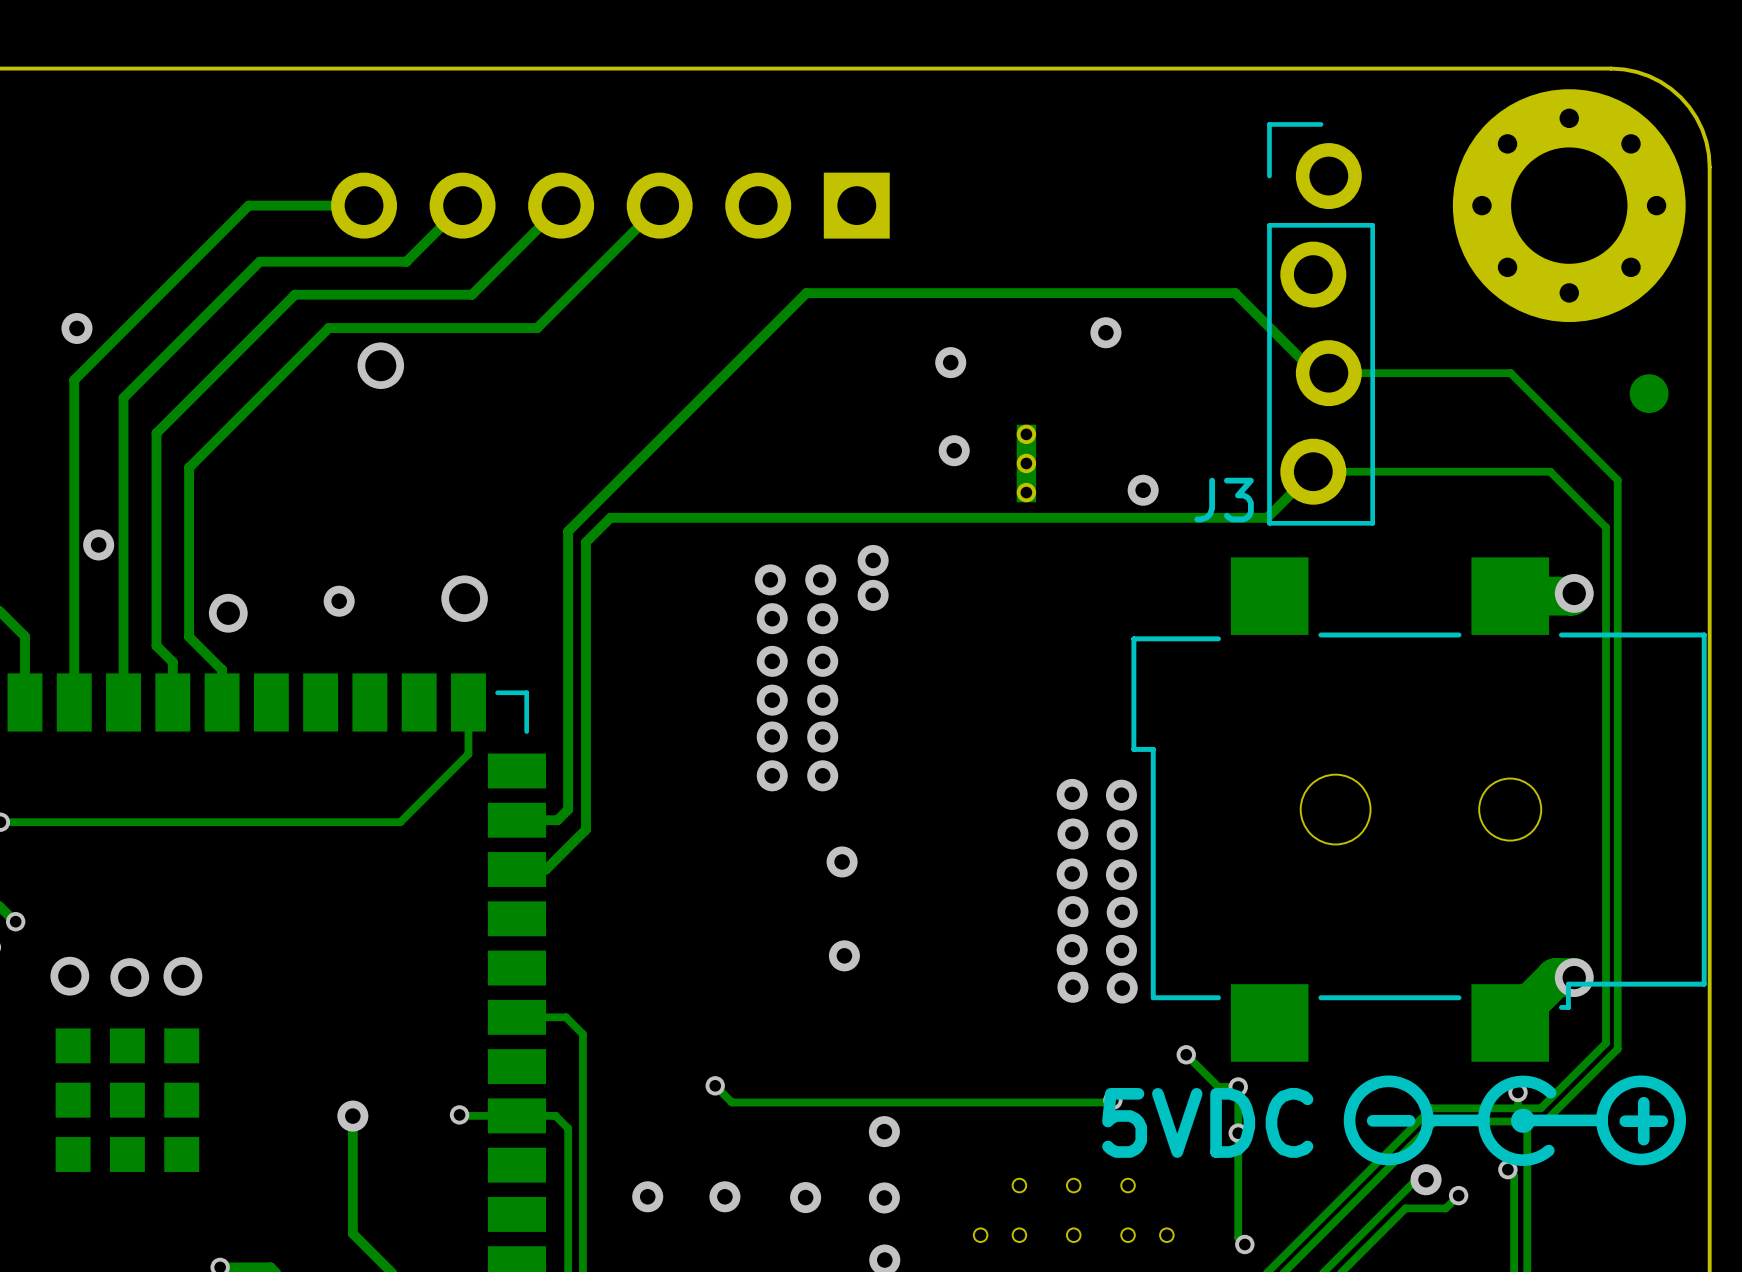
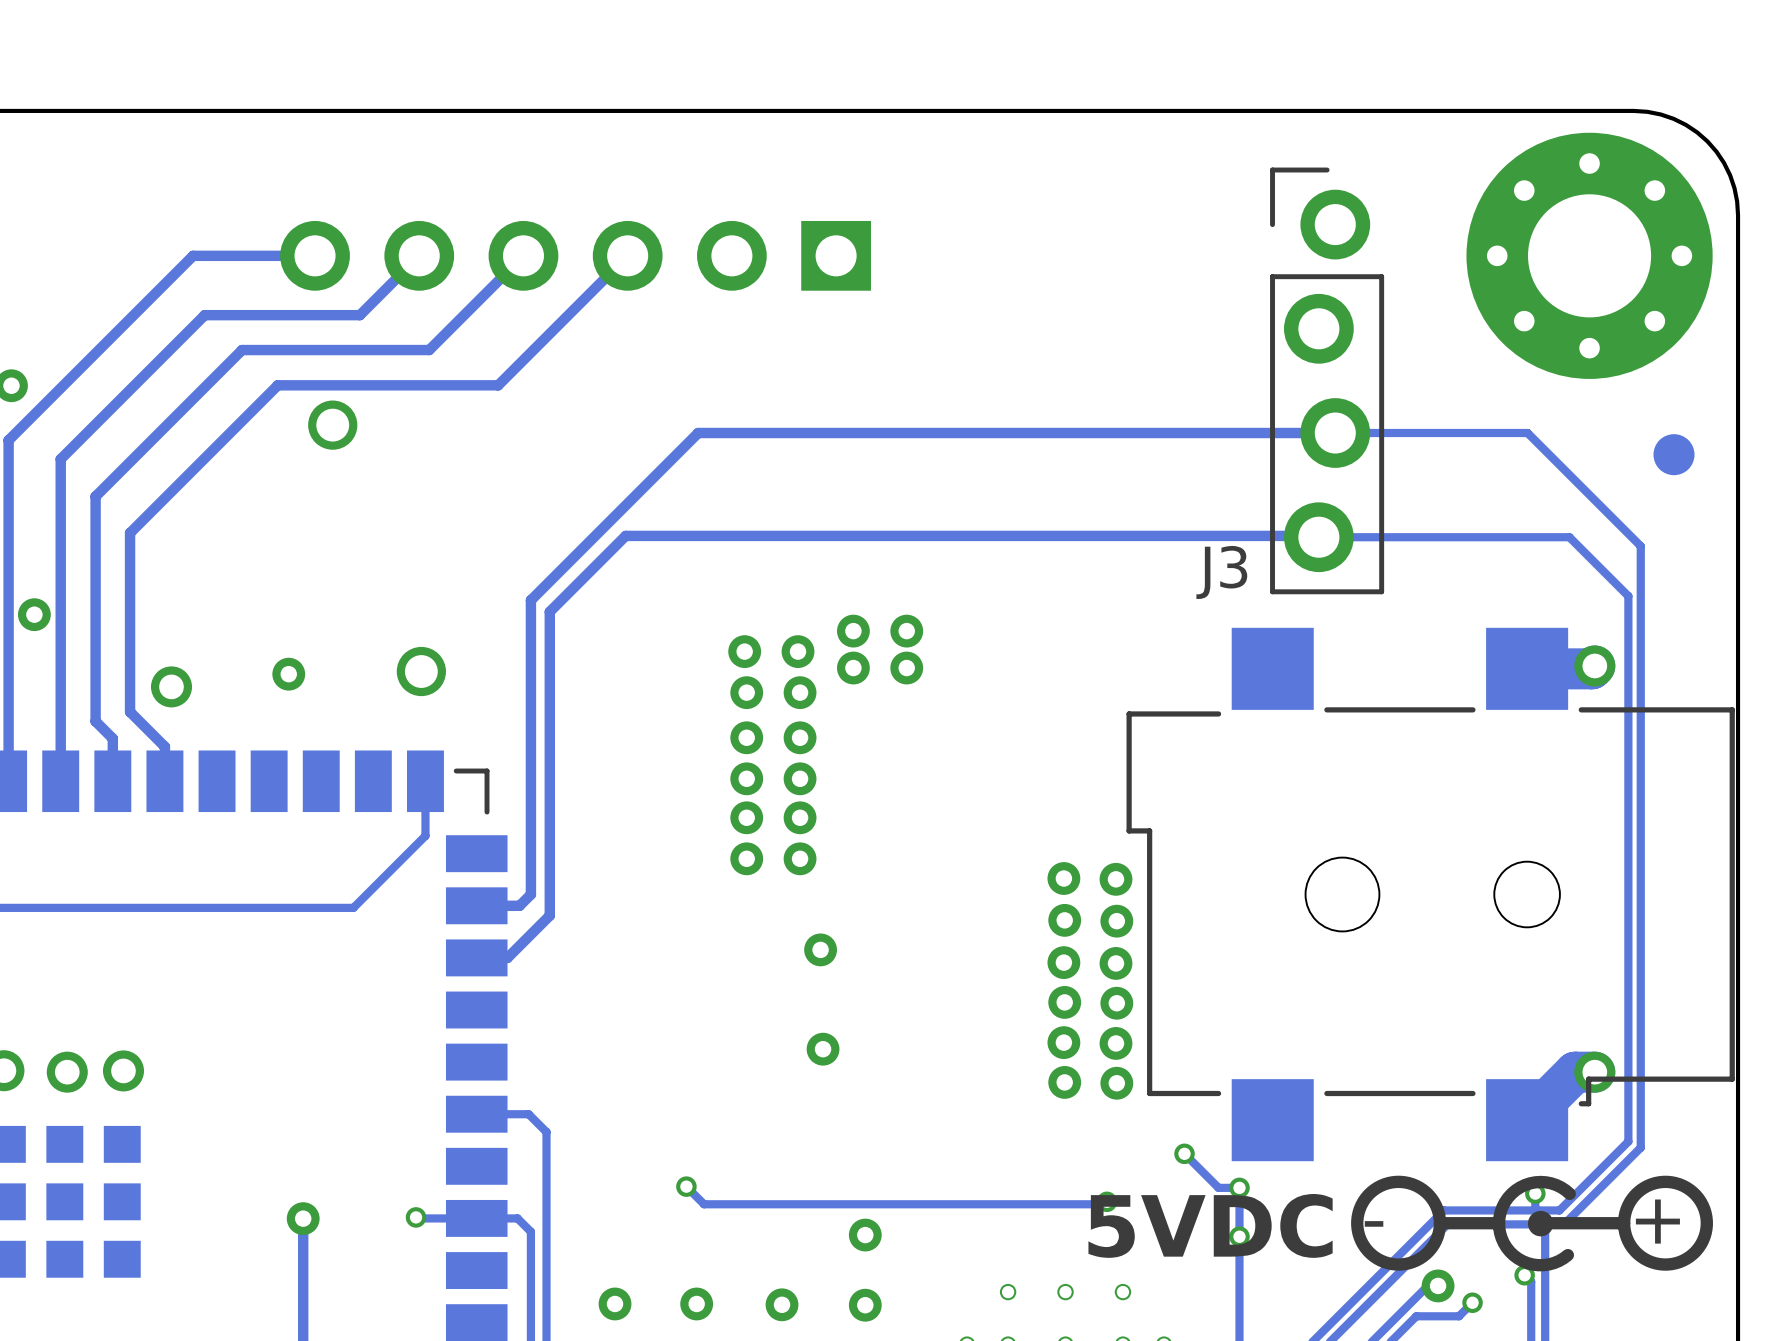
via: (1105, 332) -> none
via: (950, 362) -> none
track: (1315, 373) (1235, 293) (806, 293) (726, 373) -> (1320, 433) (698, 433)
via: (954, 450) -> none
part: (1026, 463) -> none
track: (1326, 471) (1313, 471) (1267, 517) (610, 517) -> (1333, 537) (625, 535) (575, 585)
via: (1143, 490) -> none
via: none -> (906, 631)
via: none -> (906, 668)

